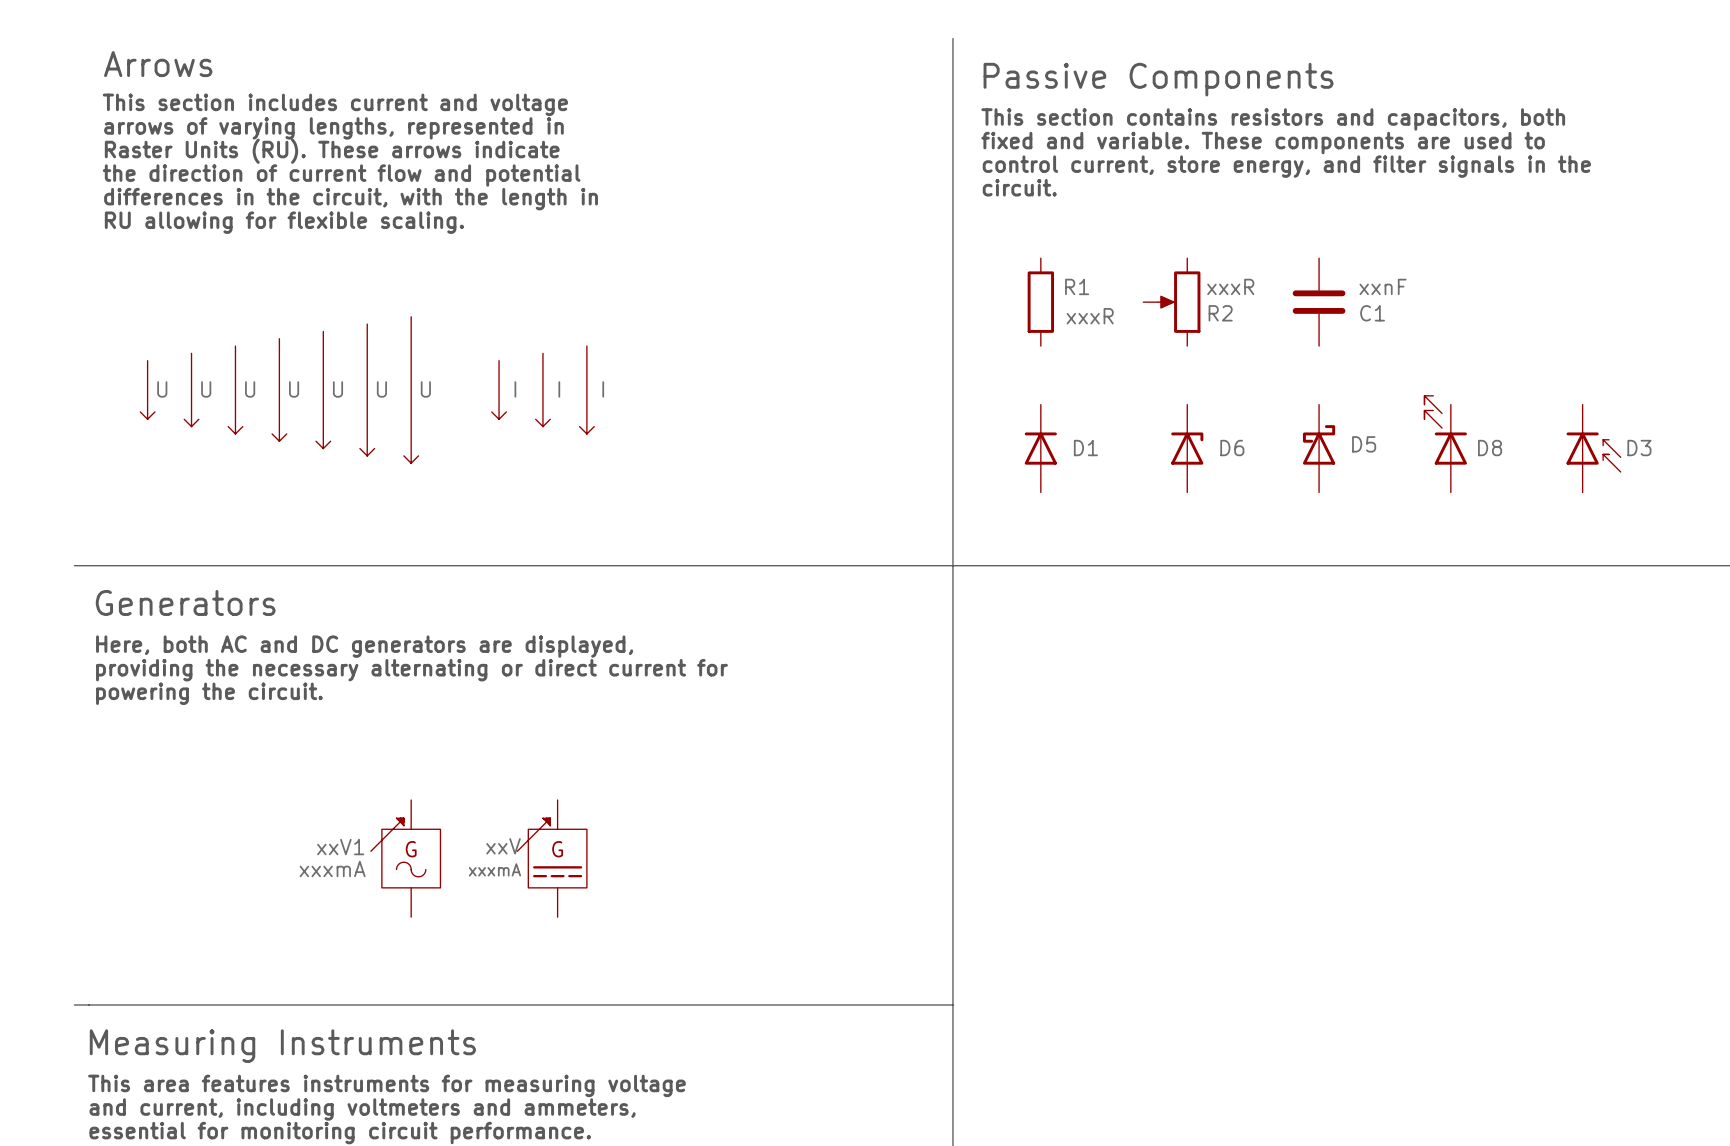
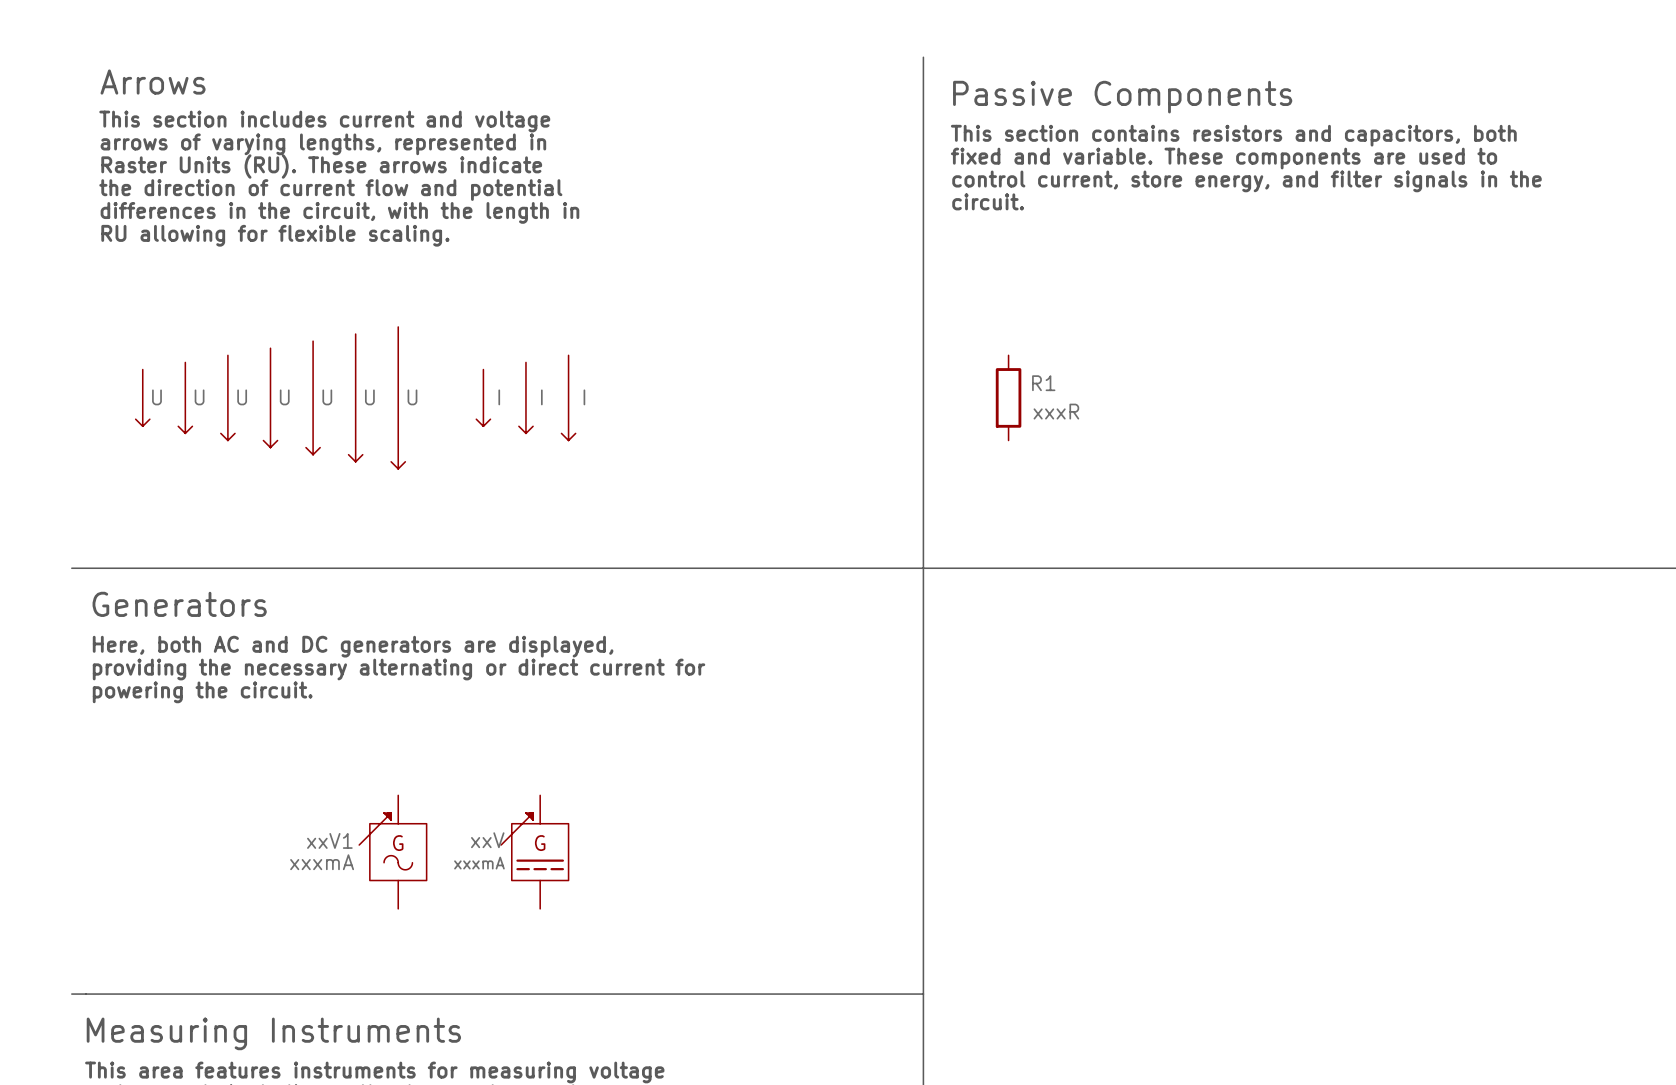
R1 position: (1040, 302) -> (1008, 397)
R2: xxxR (1171, 302) -> none
C1: xxnF (1319, 302) -> none
D8: (1445, 444) -> none
D1: (1040, 448) -> none
D6: (1187, 448) -> none
D5: (1319, 448) -> none
D3: (1593, 448) -> none

